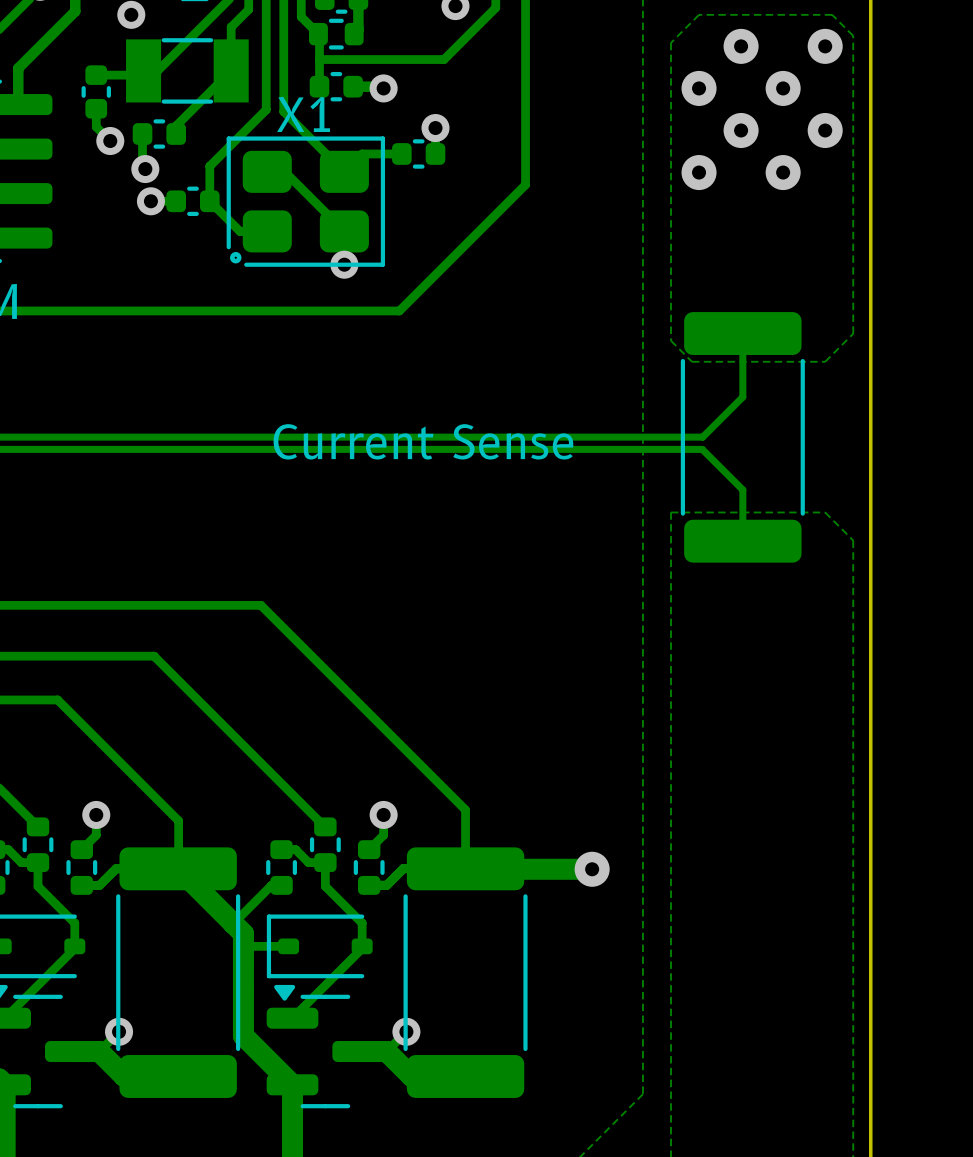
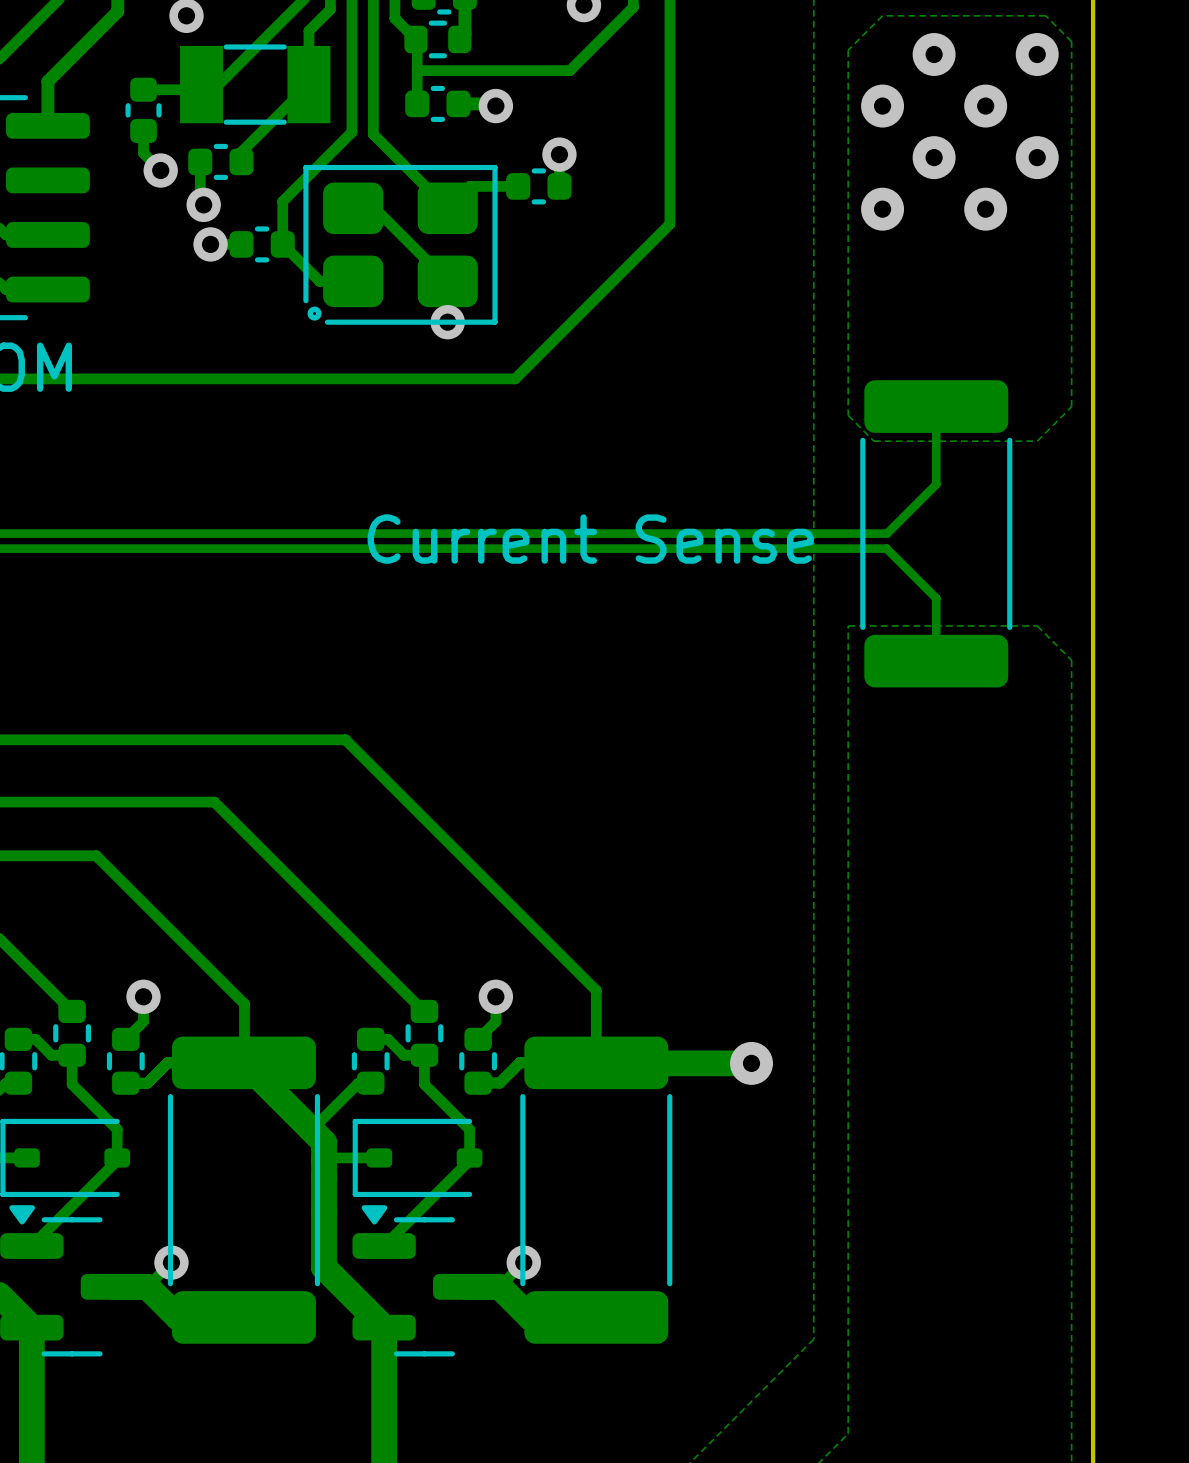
X1 name: X1 (303, 114) -> none

